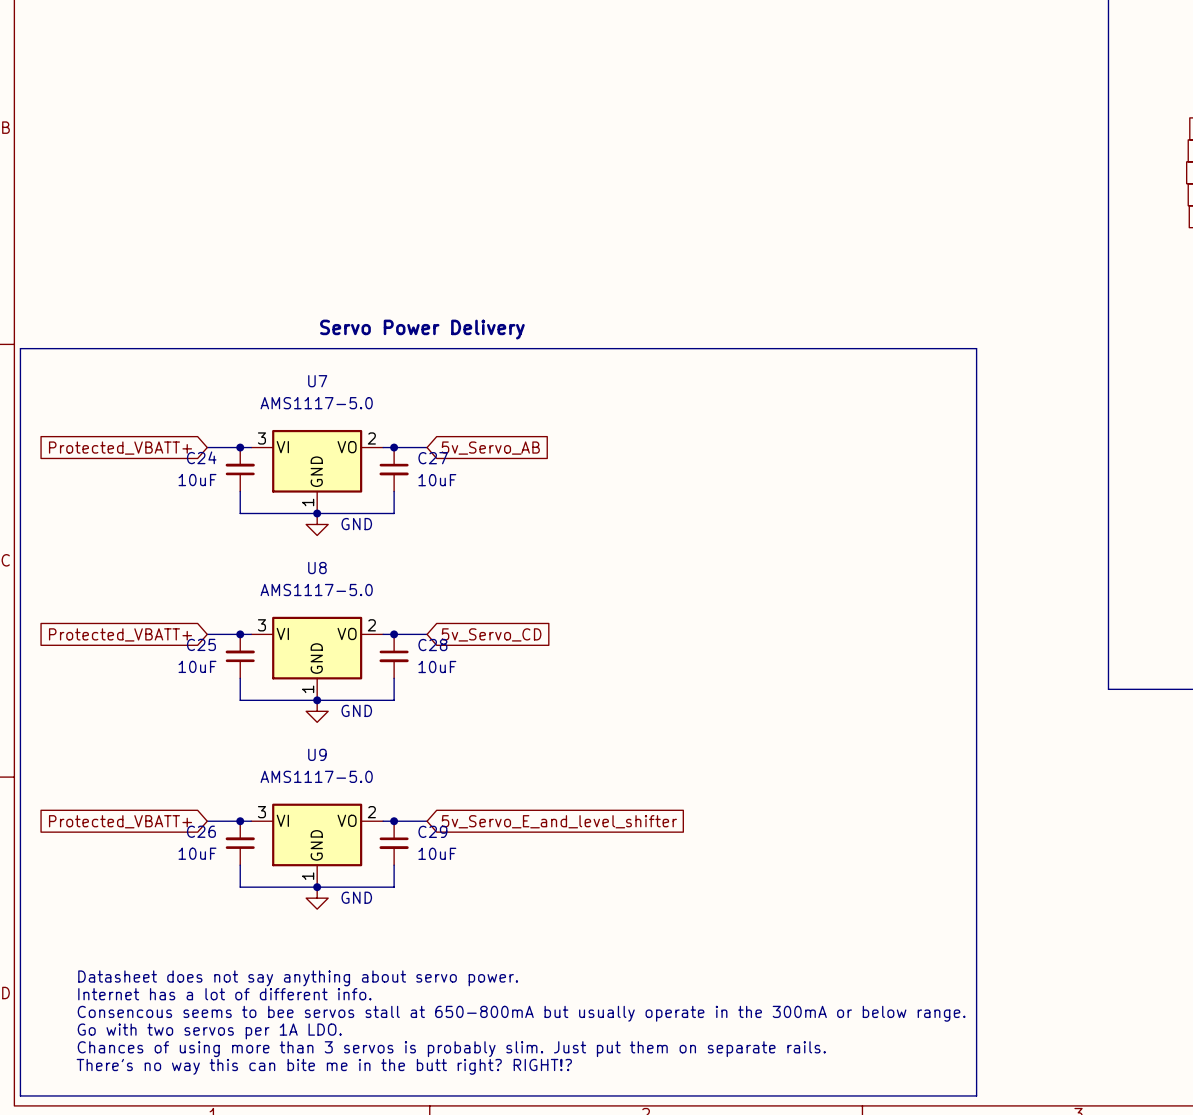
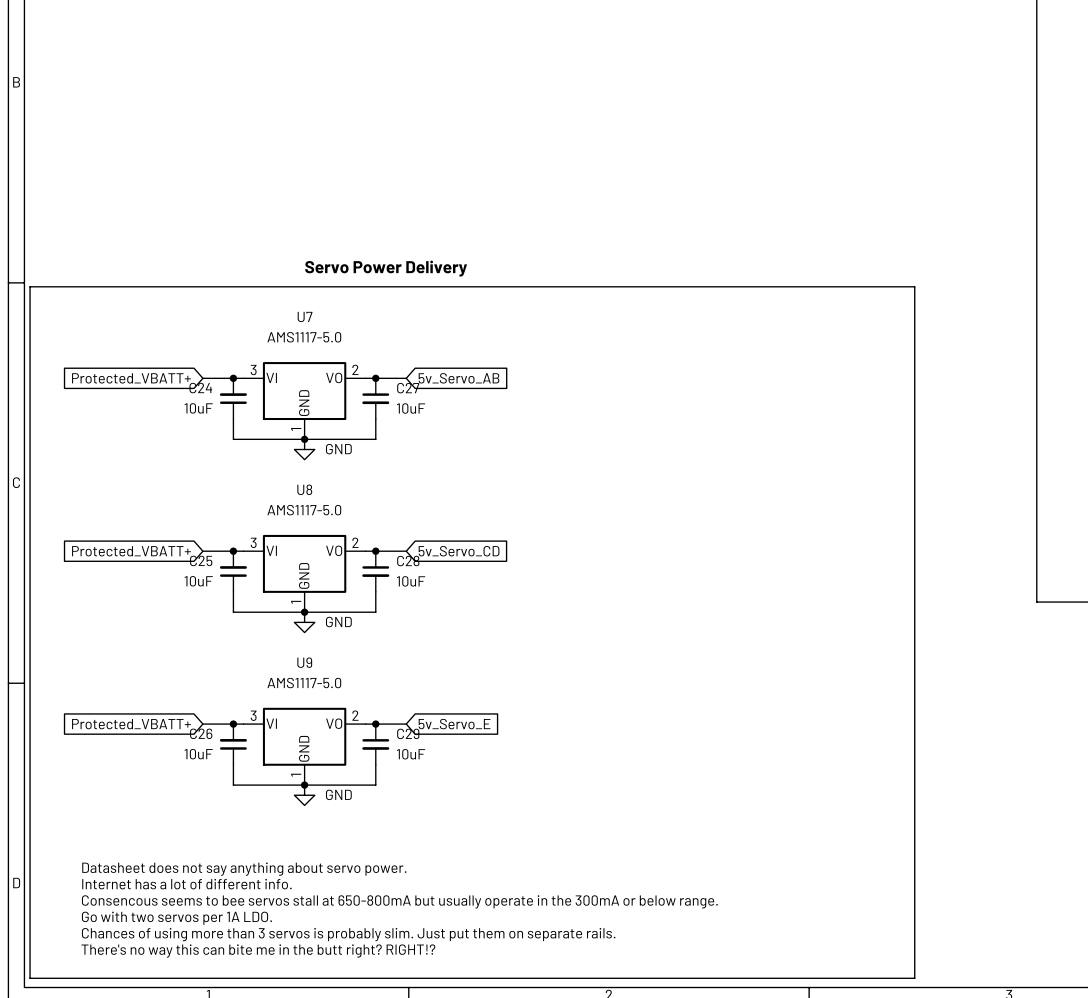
global label: 5v_Servo_E_and_level_shifter (559, 821) -> 5v_Servo_E (454, 724)

